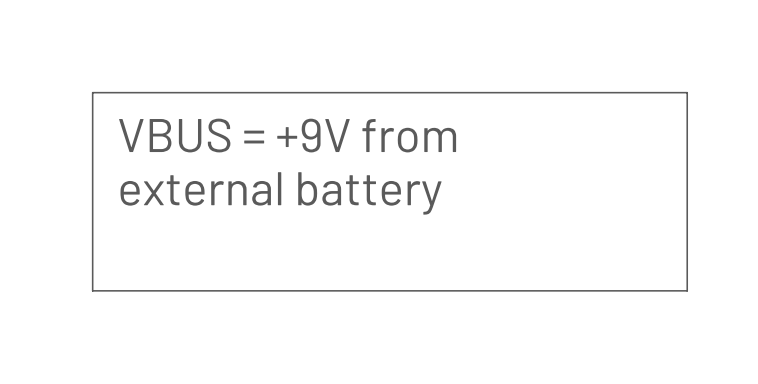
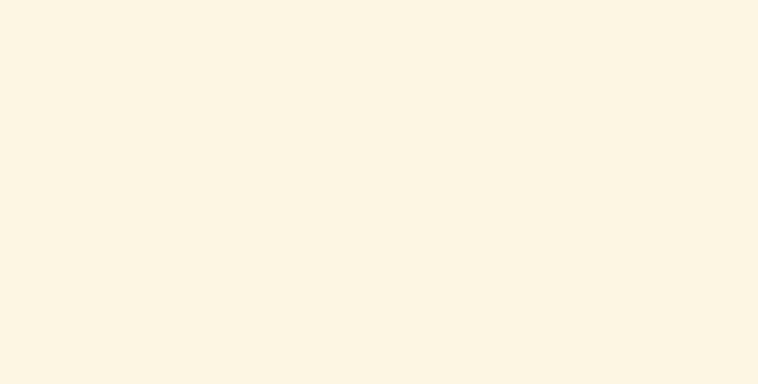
line: (92, 92) (687, 92) (687, 290) (92, 290) (92, 92) -> none
text: VBUS = +9V from (287, 135) -> none
text: external battery (281, 193) -> none

